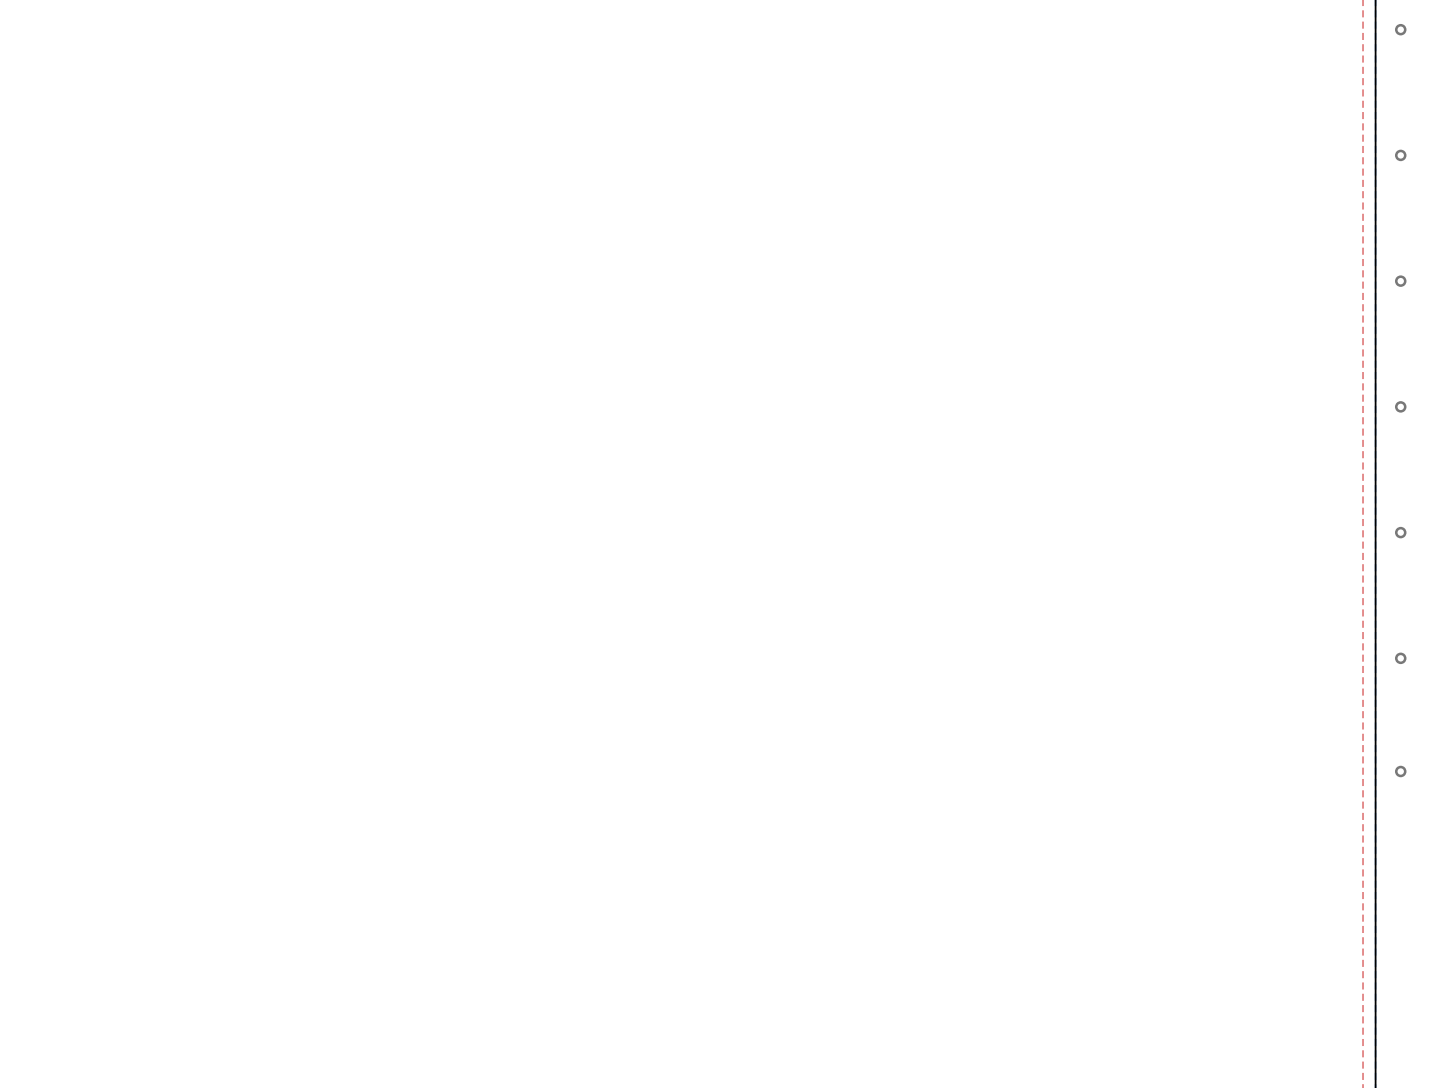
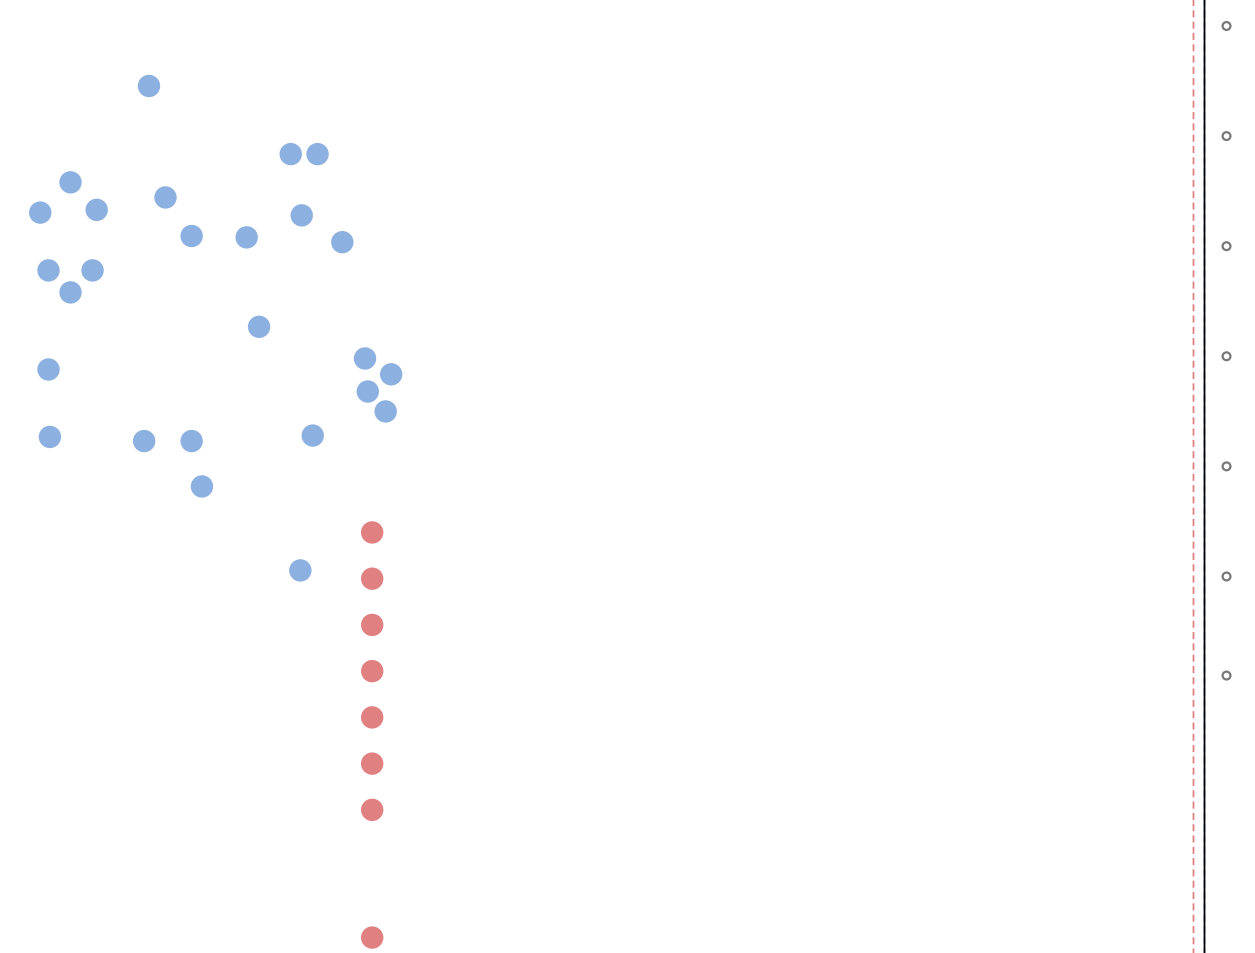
part: none -> (148, 85)
part: none -> (290, 154)
part: none -> (317, 154)
part: none -> (70, 182)
part: none -> (165, 197)
part: none -> (96, 209)
part: none -> (40, 212)
part: none -> (301, 215)
part: none -> (191, 235)
part: none -> (246, 237)
part: none -> (342, 242)
part: none -> (48, 270)
part: none -> (92, 270)
part: none -> (70, 292)
part: none -> (259, 326)
part: none -> (365, 358)
part: none -> (48, 369)
part: none -> (391, 374)
part: none -> (367, 391)
part: none -> (385, 411)
part: none -> (312, 435)
part: none -> (49, 436)
part: none -> (144, 441)
part: none -> (191, 441)
part: none -> (201, 486)
part: none -> (372, 532)
part: none -> (300, 570)
part: none -> (372, 578)
part: none -> (372, 624)
part: none -> (372, 671)
part: none -> (372, 717)
part: none -> (372, 763)
part: none -> (372, 809)
part: none -> (372, 937)

